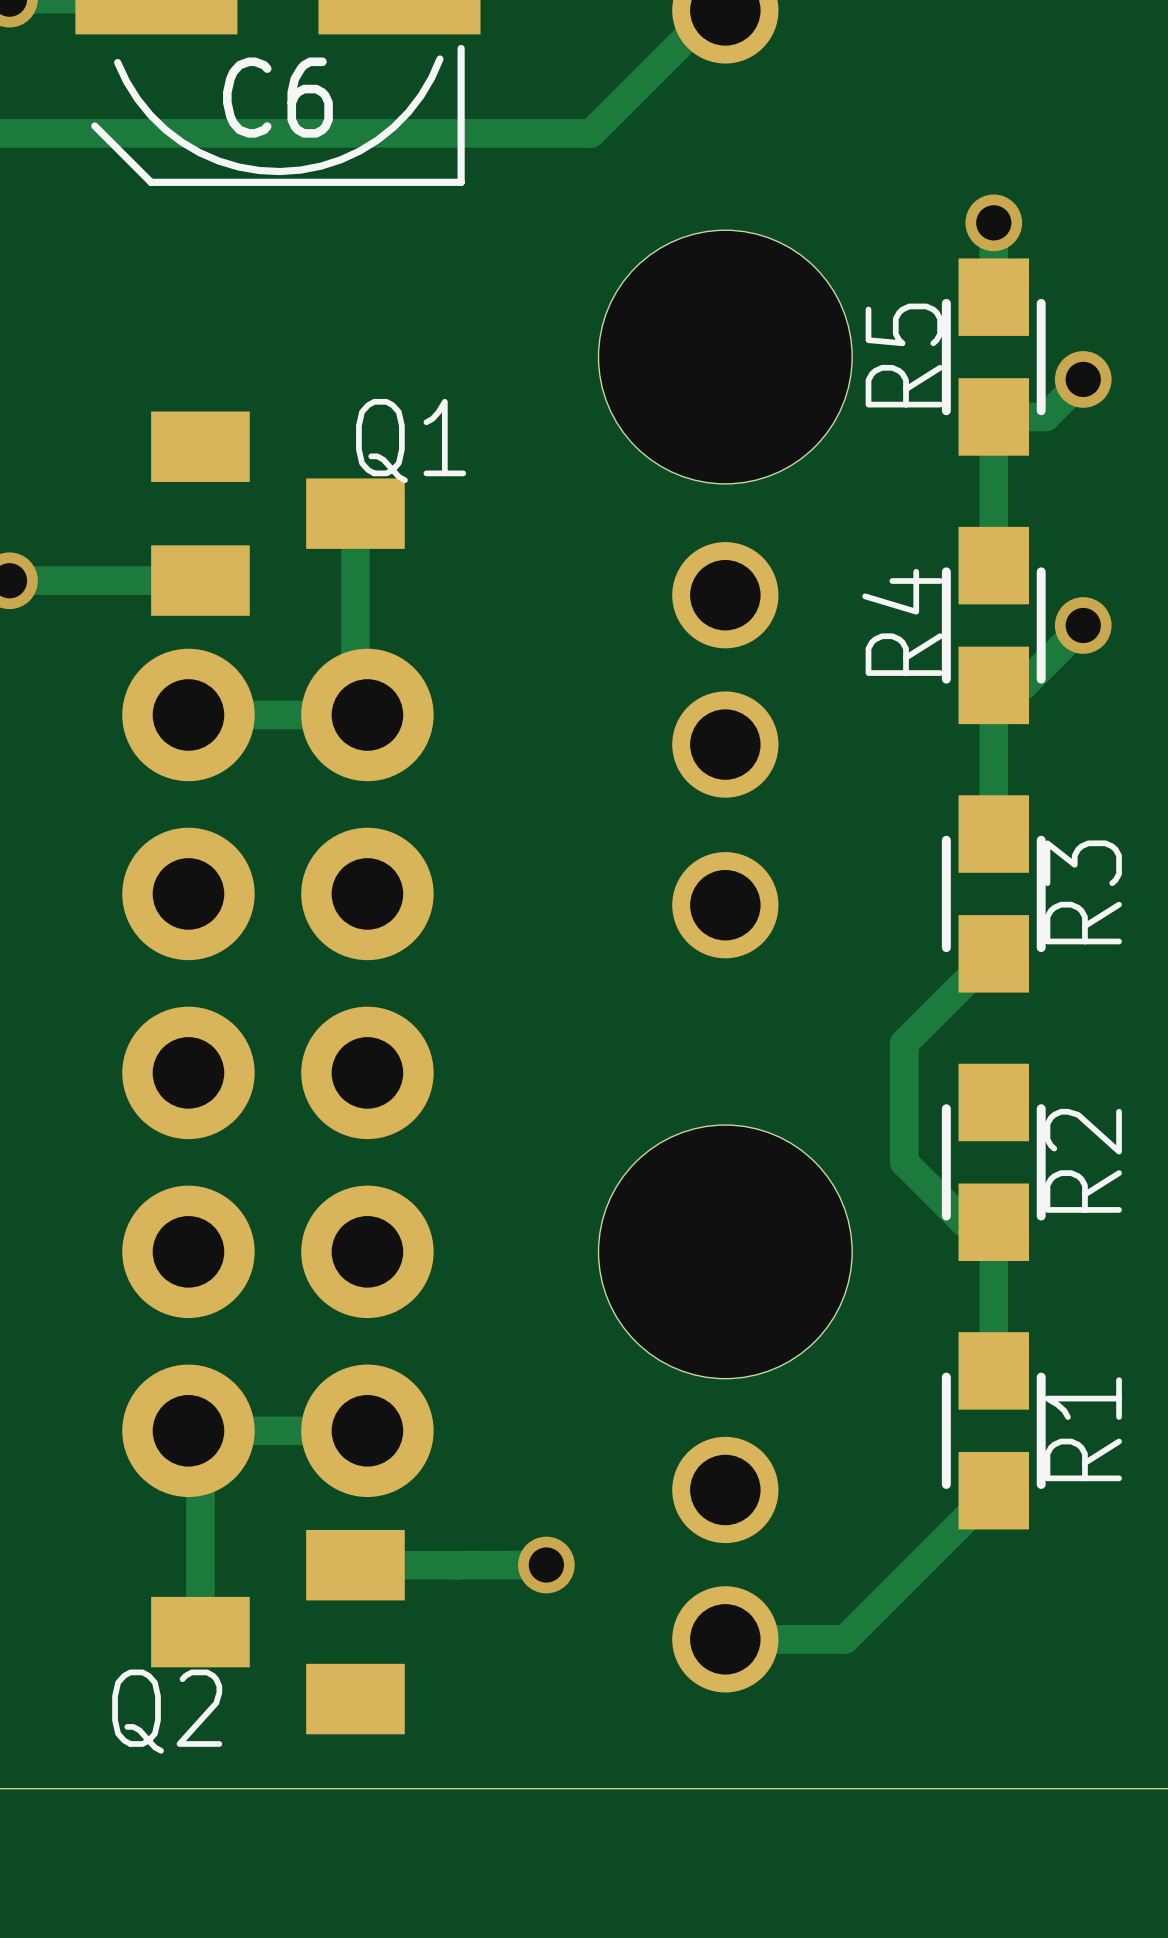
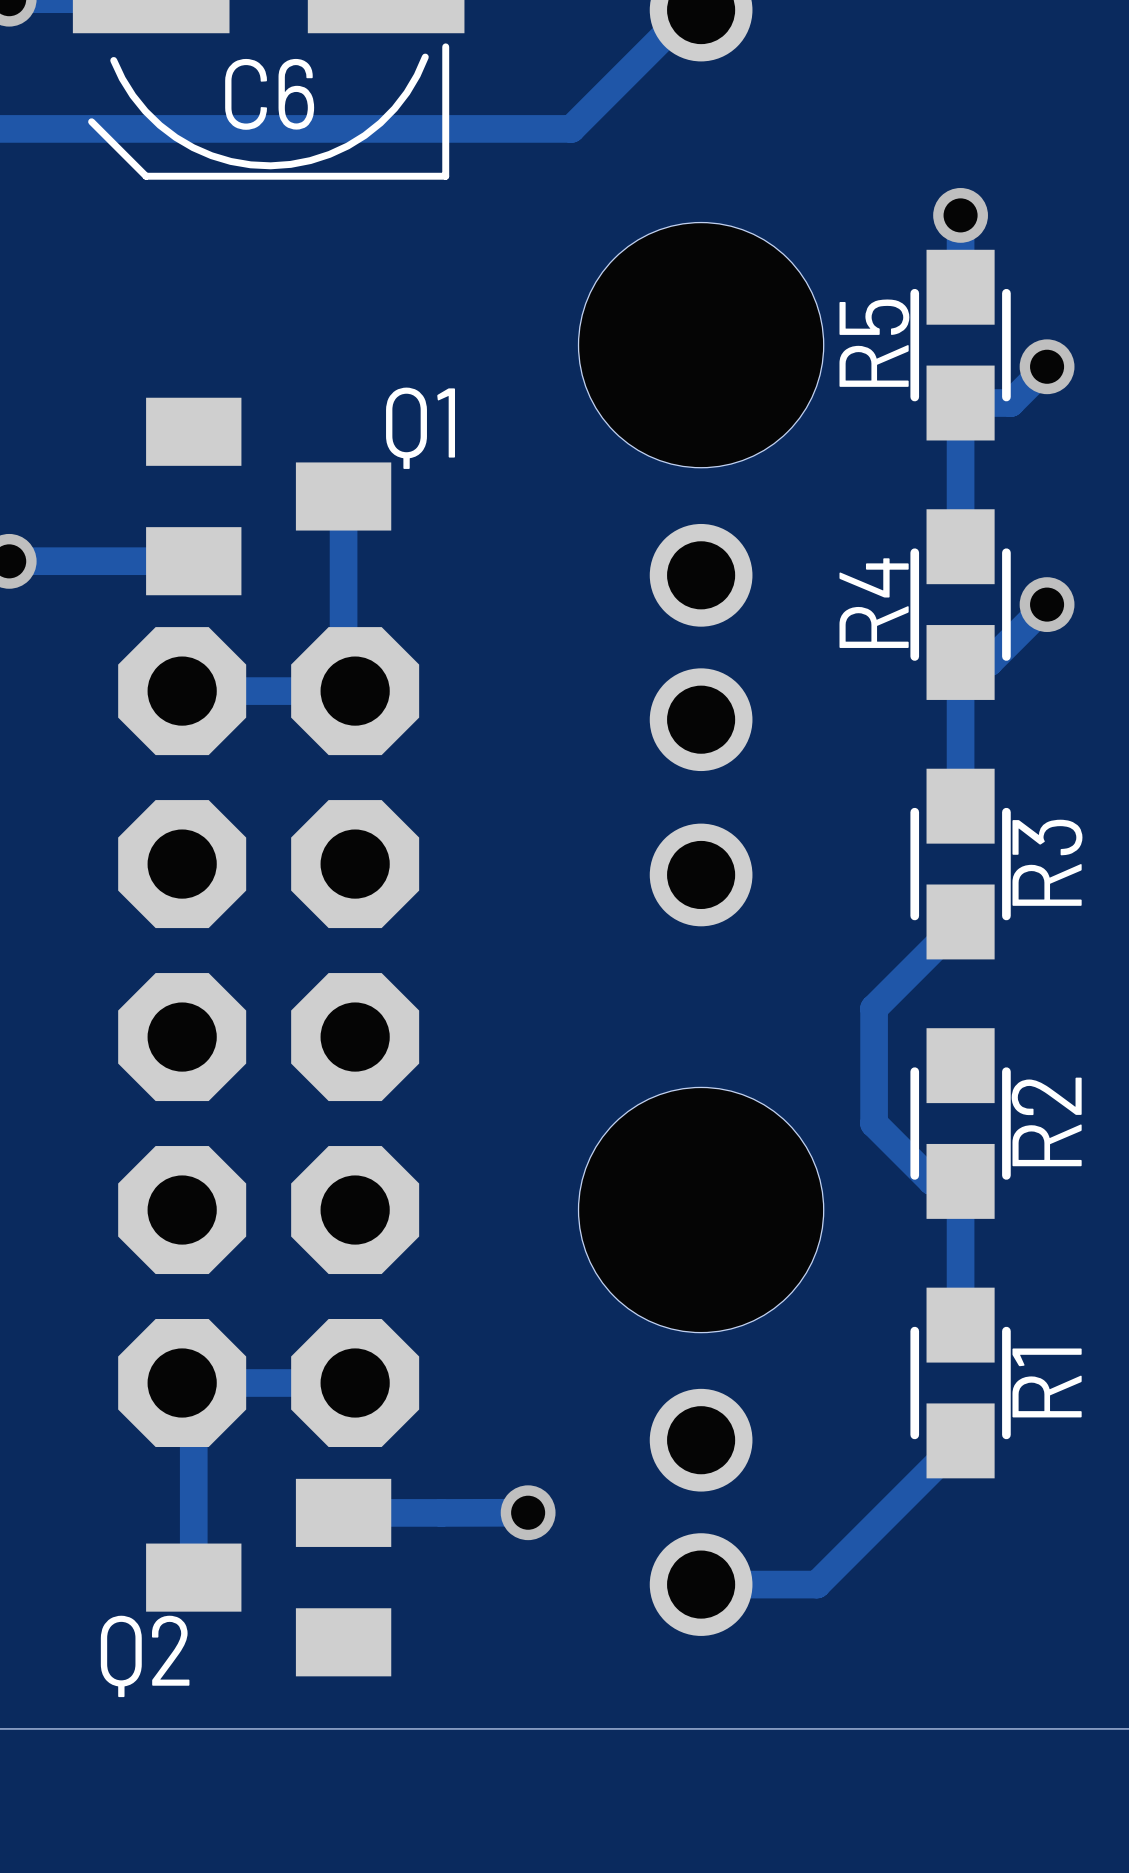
part footprint: [122, 648, 434, 1498] -> [118, 627, 420, 1448]

